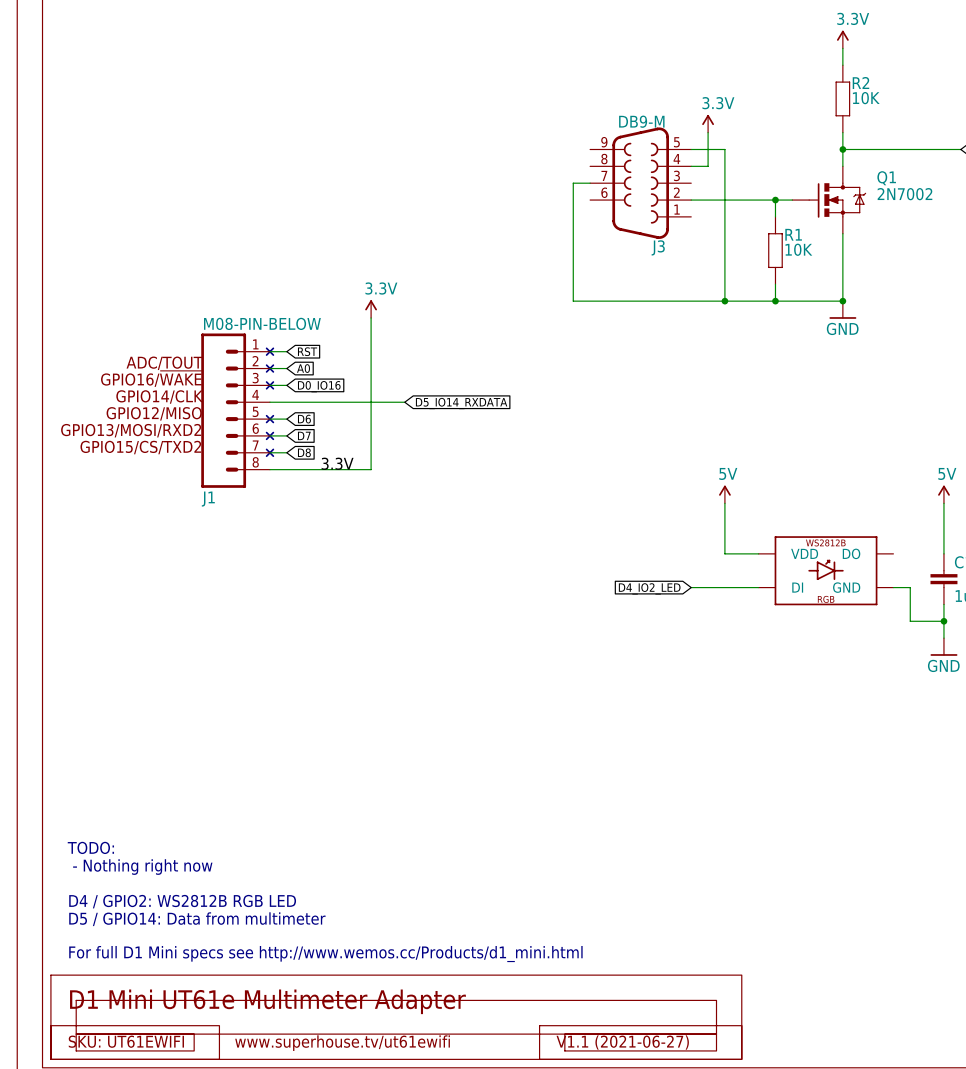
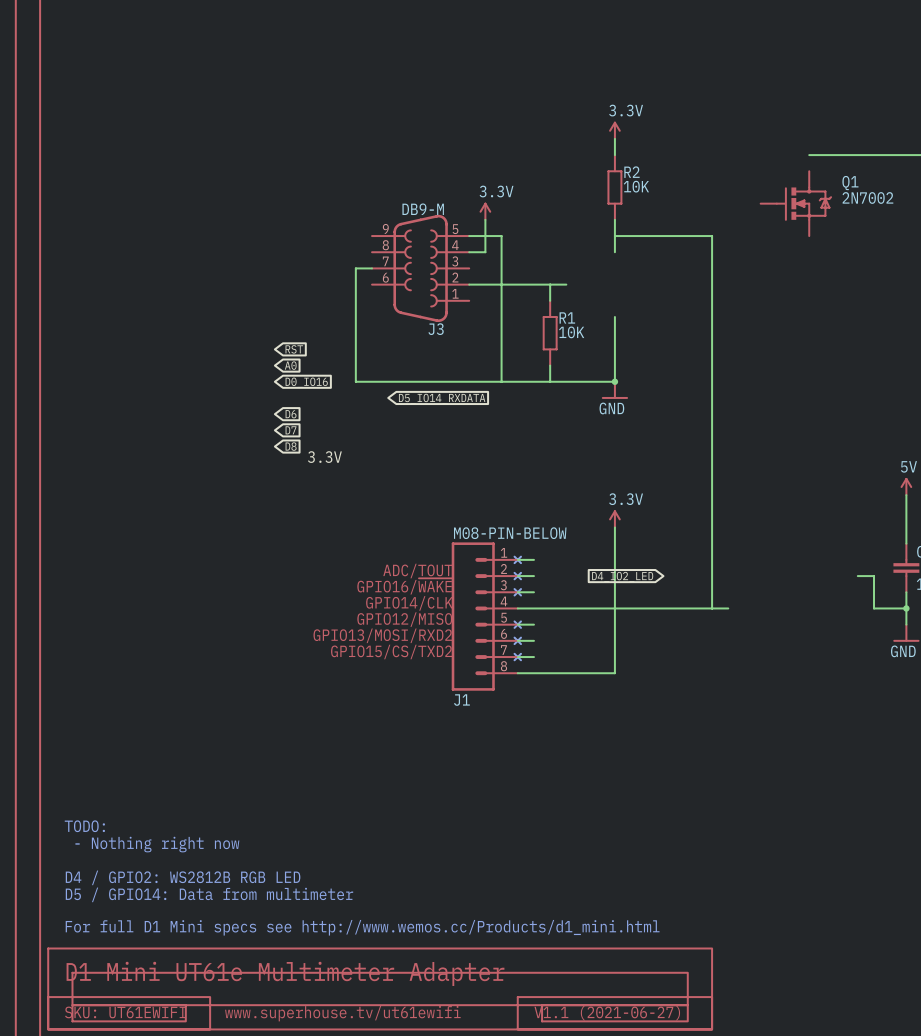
power symbol: 3.3V (842, 39) -> none
wire: (842, 48) (842, 65) -> none
R2 position: (842, 98) -> (614, 187)
power symbol position: 3.3V (708, 123) -> 3.3V (614, 130)
wire: (708, 132) (708, 166) (691, 166) -> none
wire: (842, 132) (842, 166) -> none
wire: (691, 149) (724, 149) (724, 301) -> none
junction: (842, 149) -> none
wire: (590, 183) (573, 183) (573, 284) -> none
J3 position: (640, 183) -> (420, 268)
wire: (691, 200) (792, 200) -> none
wire: (775, 200) (775, 216) -> (614, 138) (614, 155)
junction: (775, 200) -> none
power symbol: none -> 3.3V (485, 211)
wire: none -> (485, 219) (485, 252) (469, 252)
wire: none -> (614, 219) (614, 252)
wire: none -> (469, 236) (501, 236) (501, 381)
wire: none -> (614, 236) (712, 236) (712, 608)
wire: (842, 233) (842, 301) (573, 301) -> none
R1 position: (775, 250) -> (550, 333)
wire: none -> (372, 268) (355, 268) (355, 317)
wire: none -> (469, 284) (566, 284)
wire: (775, 284) (775, 301) -> none
junction: (724, 301) -> none
junction: (775, 301) -> none
junction: (842, 301) -> none
power symbol: 3.3V (371, 309) -> none
power symbol: GND (842, 309) -> none
wire: (269, 351) (286, 351) -> none
part: (269, 351) -> none
text: ADC/TOUT (164, 363) -> none
wire: (269, 368) (286, 368) -> none
part: (269, 368) -> none
wire: none -> (550, 365) (550, 381)
text: GPIO16/~{WAKE} (151, 378) -> none
wire: (269, 385) (286, 385) -> none
part: (269, 385) -> none
wire: (371, 385) (371, 469) (269, 469) -> (355, 381) (614, 381) (614, 317)
junction: none -> (614, 381)
power symbol: none -> GND (614, 390)
text: GPIO14/CLK (159, 396) -> none
wire: (269, 402) (404, 402) -> none
J1 position: (235, 410) -> (484, 616)
text: GPIO12/MISO (154, 413) -> none
wire: (269, 419) (286, 419) -> none
part: (269, 419) -> none
text: GPIO13/MOSI/RXD2 (131, 430) -> none
wire: (269, 435) (286, 435) -> none
part: (269, 435) -> none
text: GPIO15/CS/TXD2 (140, 447) -> none
wire: (269, 452) (286, 452) -> none
part: (269, 452) -> none
power symbol: 5V (724, 494) -> none
wire: (724, 503) (724, 553) (758, 553) -> none
power symbol: none -> 3.3V (614, 519)
wire: none -> (614, 527) (614, 673) (517, 673)
wire: none -> (517, 559) (533, 559)
part: none -> (517, 559)
part: (826, 570) -> none
text: none -> ADC/TOUT (417, 571)
wire: none -> (517, 576) (533, 576)
part: none -> (517, 576)
wire: (691, 587) (758, 587) -> none
text: none -> GPIO16/~{WAKE} (404, 586)
wire: none -> (517, 592) (533, 592)
part: none -> (517, 592)
text: none -> GPIO14/CLK (409, 603)
wire: none -> (517, 608) (728, 608)
text: none -> GPIO12/MISO (404, 619)
wire: none -> (517, 624) (533, 624)
part: none -> (517, 624)
text: none -> GPIO13/MOSI/RXD2 (382, 635)
wire: none -> (517, 640) (533, 640)
part: none -> (517, 640)
text: none -> GPIO15/CS/TXD2 (391, 651)
wire: none -> (517, 657) (533, 657)
part: none -> (517, 657)

